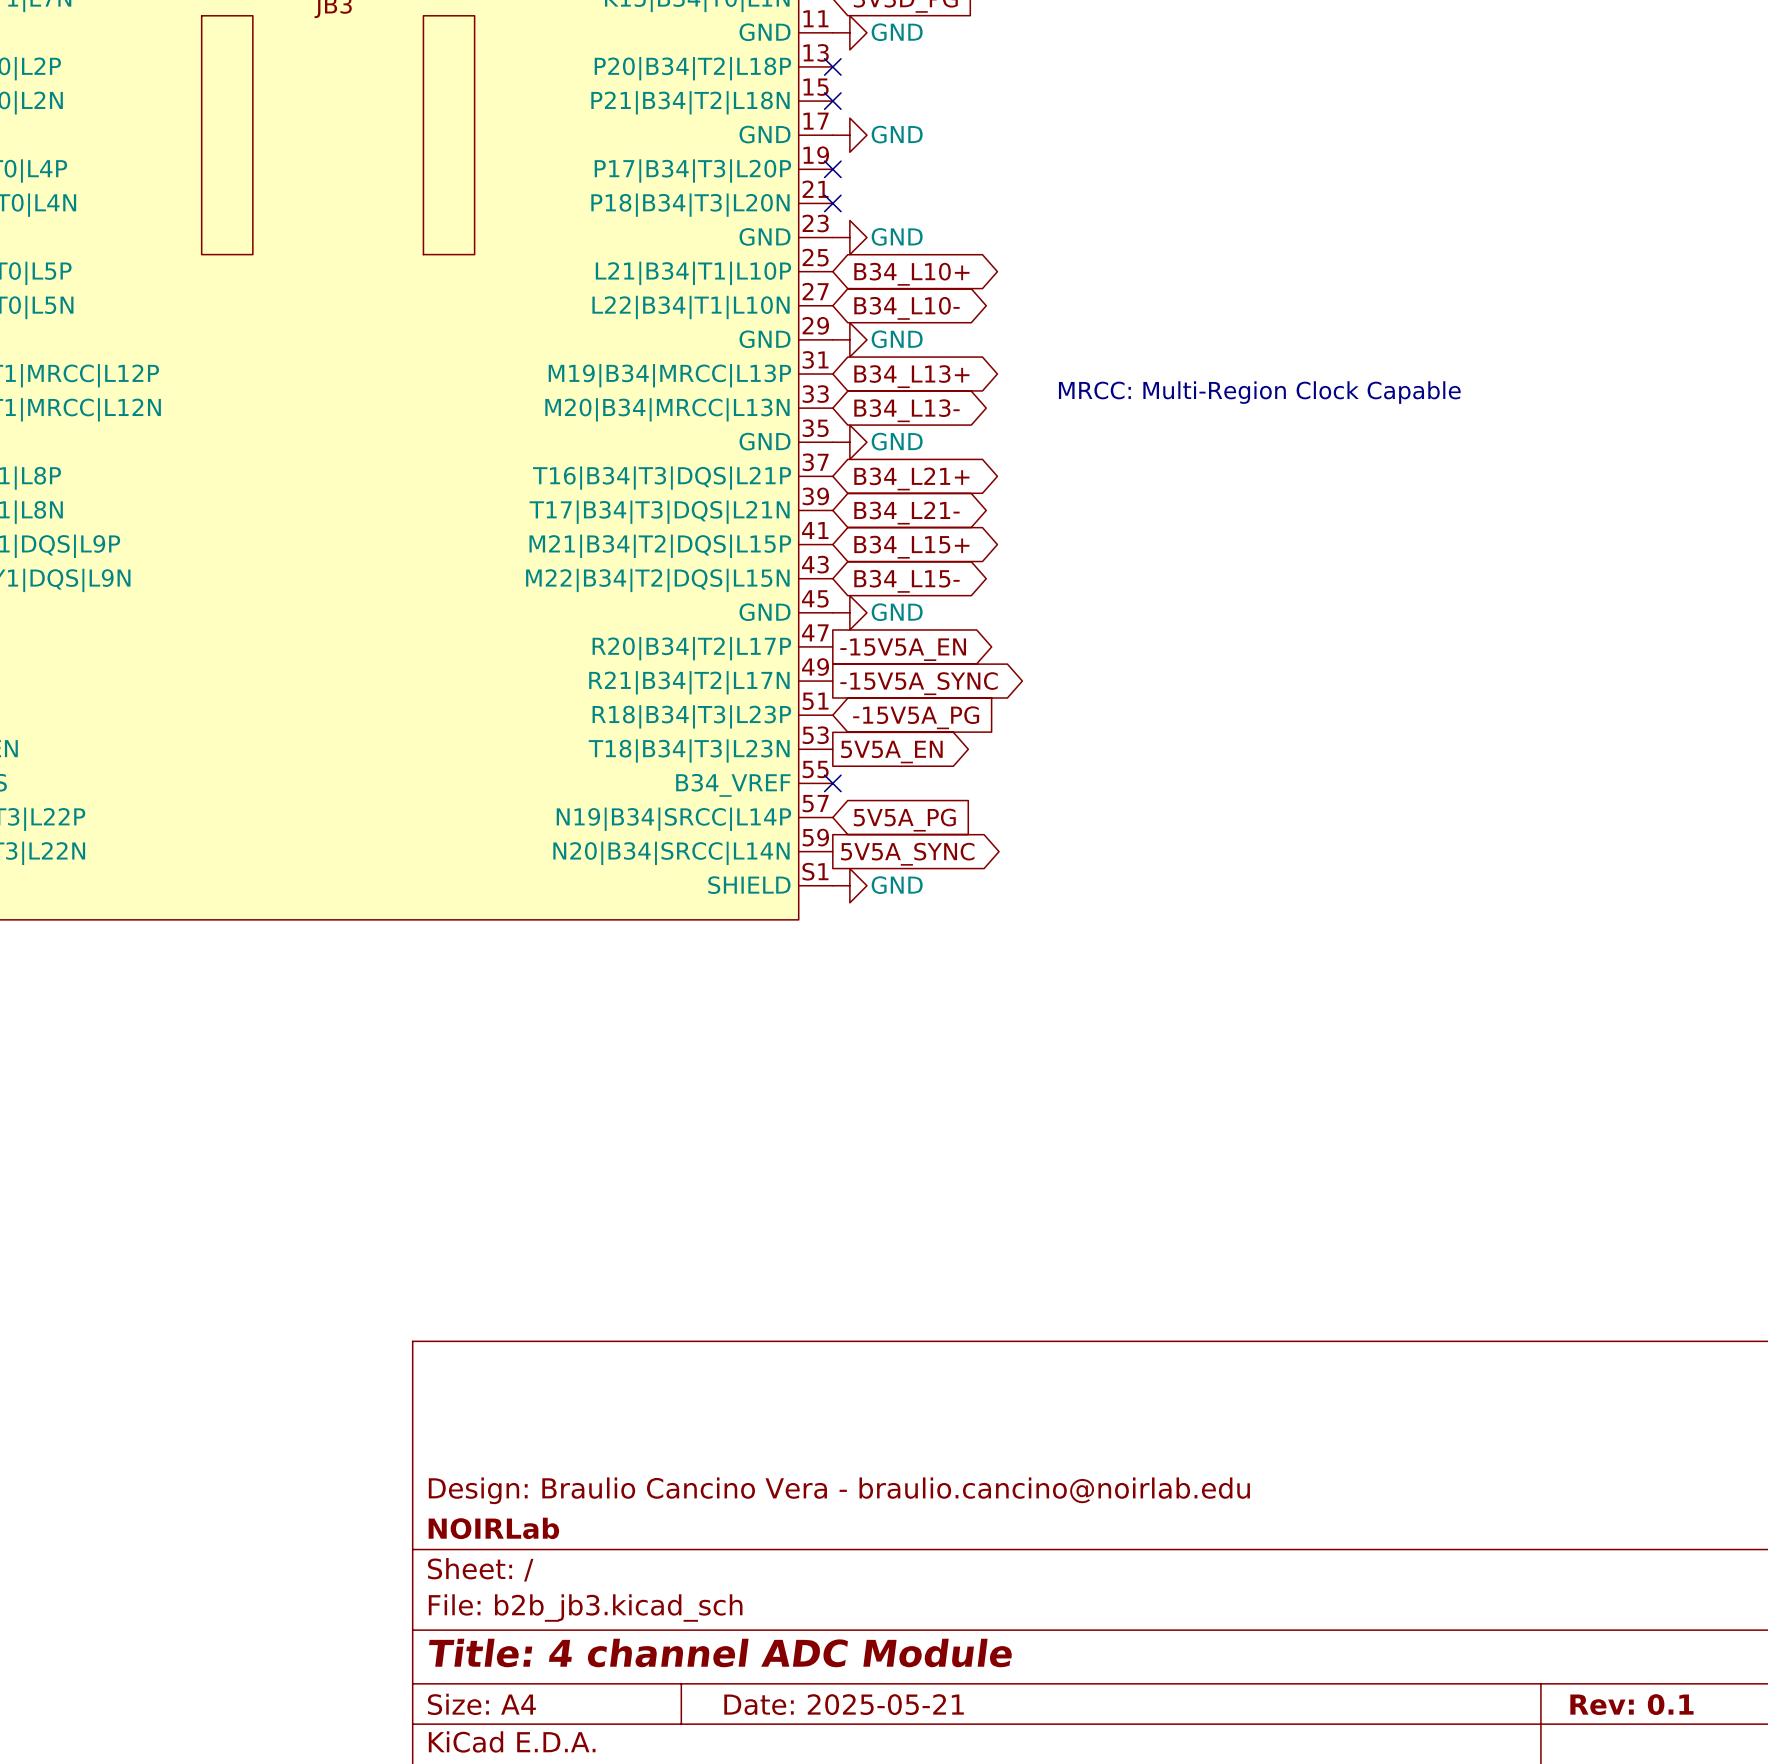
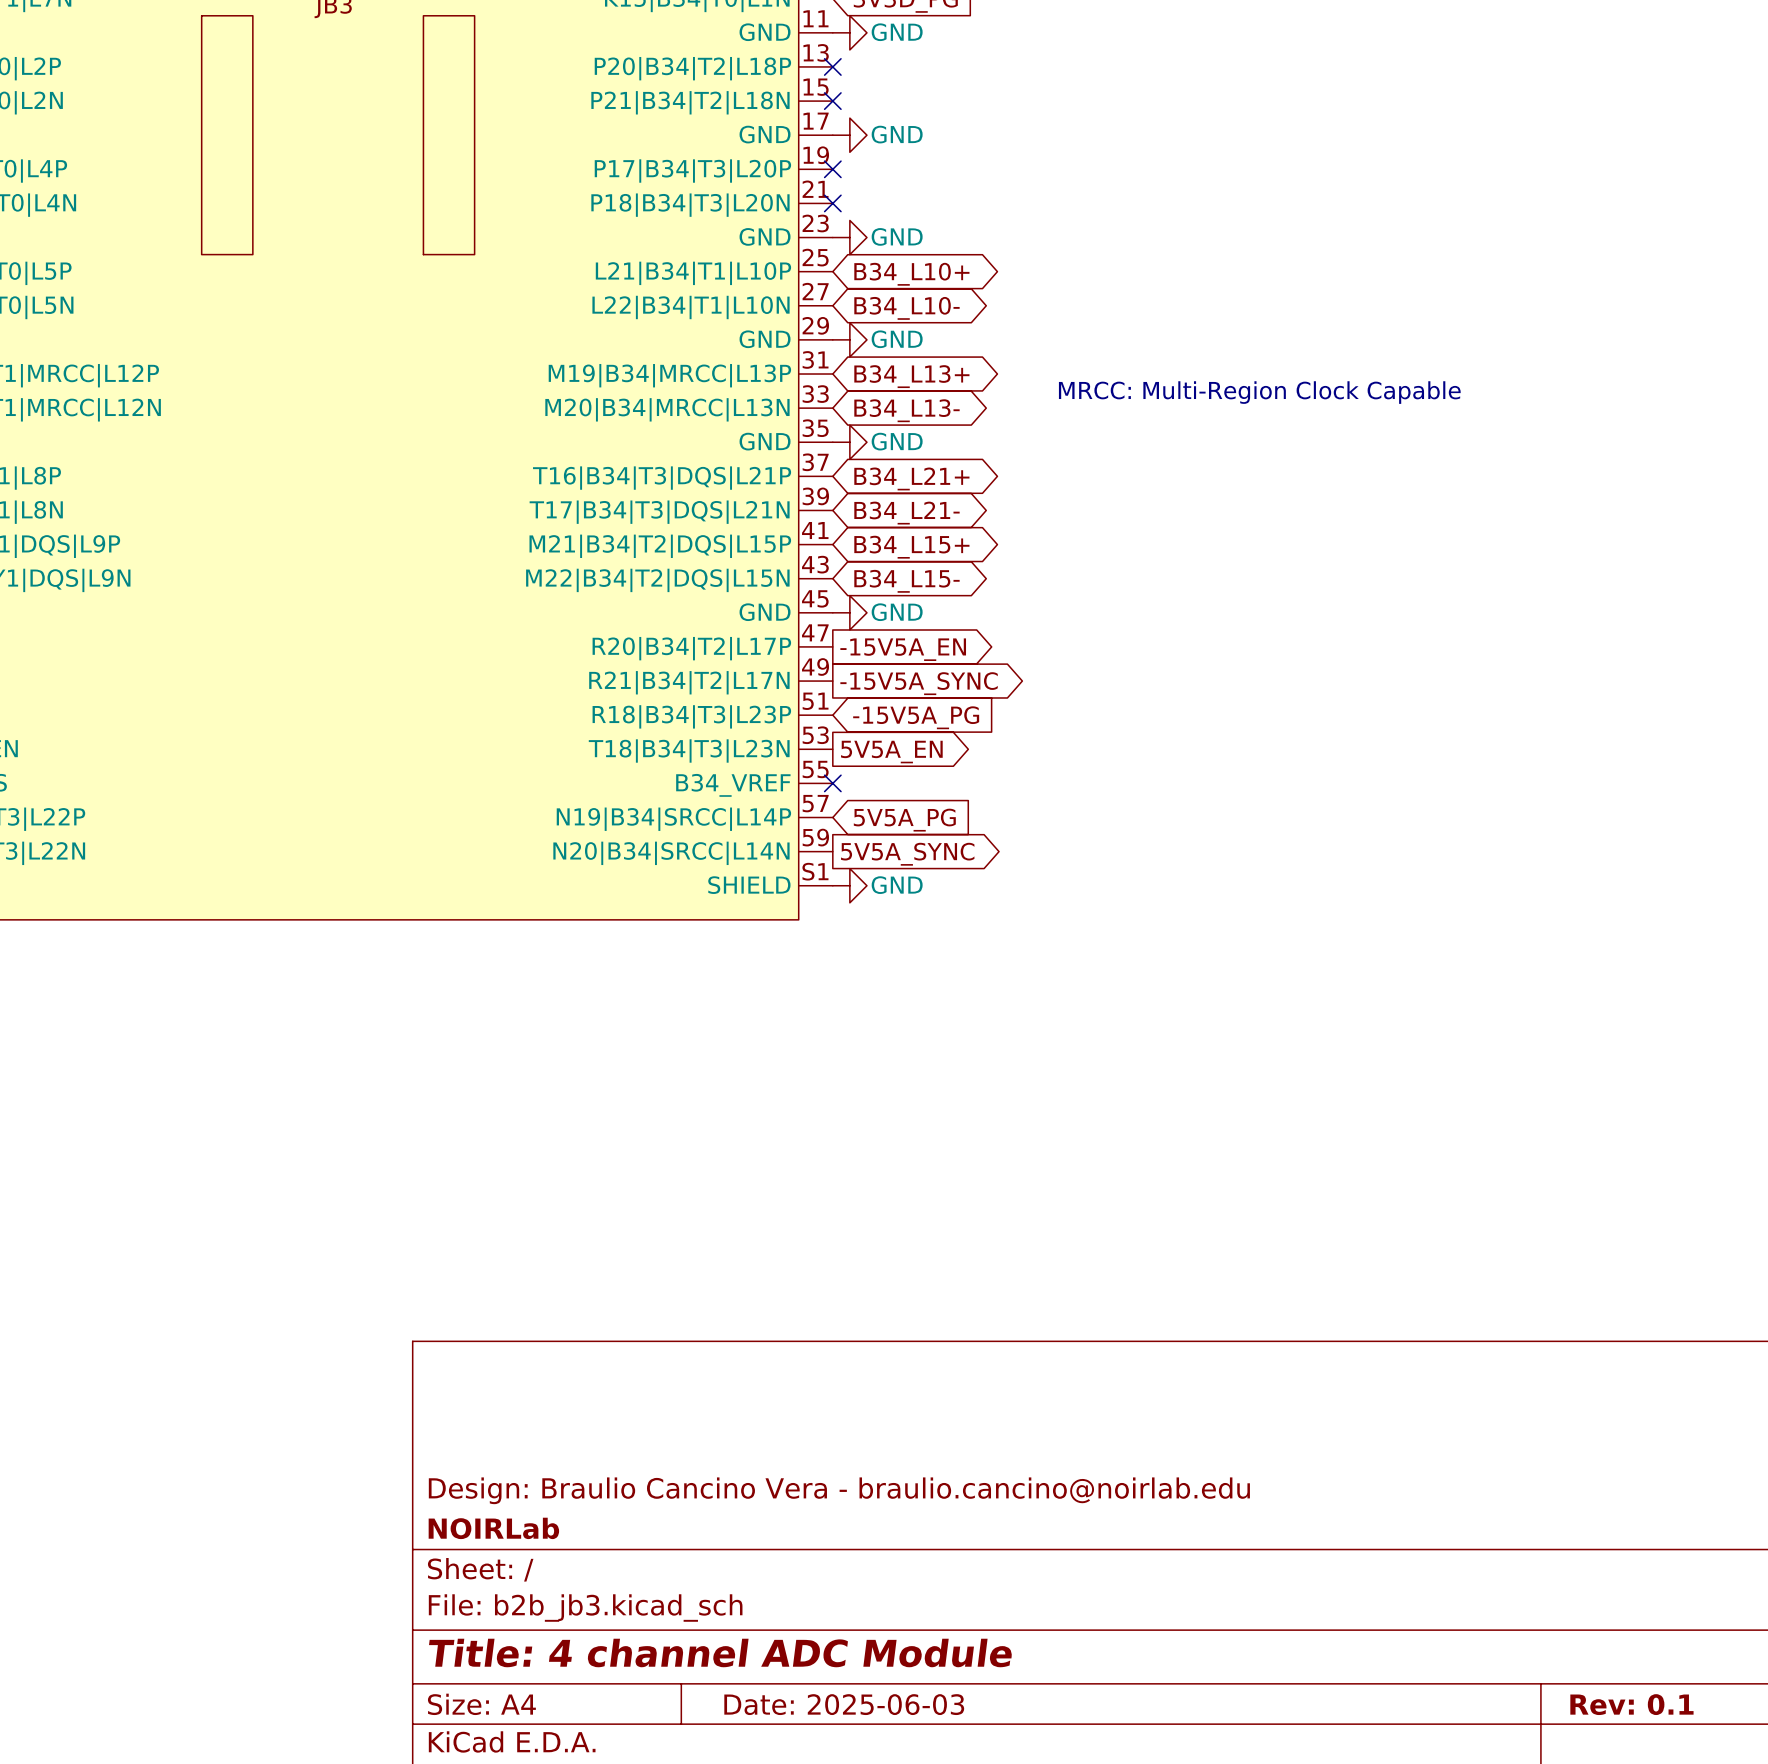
title block: Date: 2025-05-21 (844, 1704) -> Date: 2025-06-03 (844, 1704)

